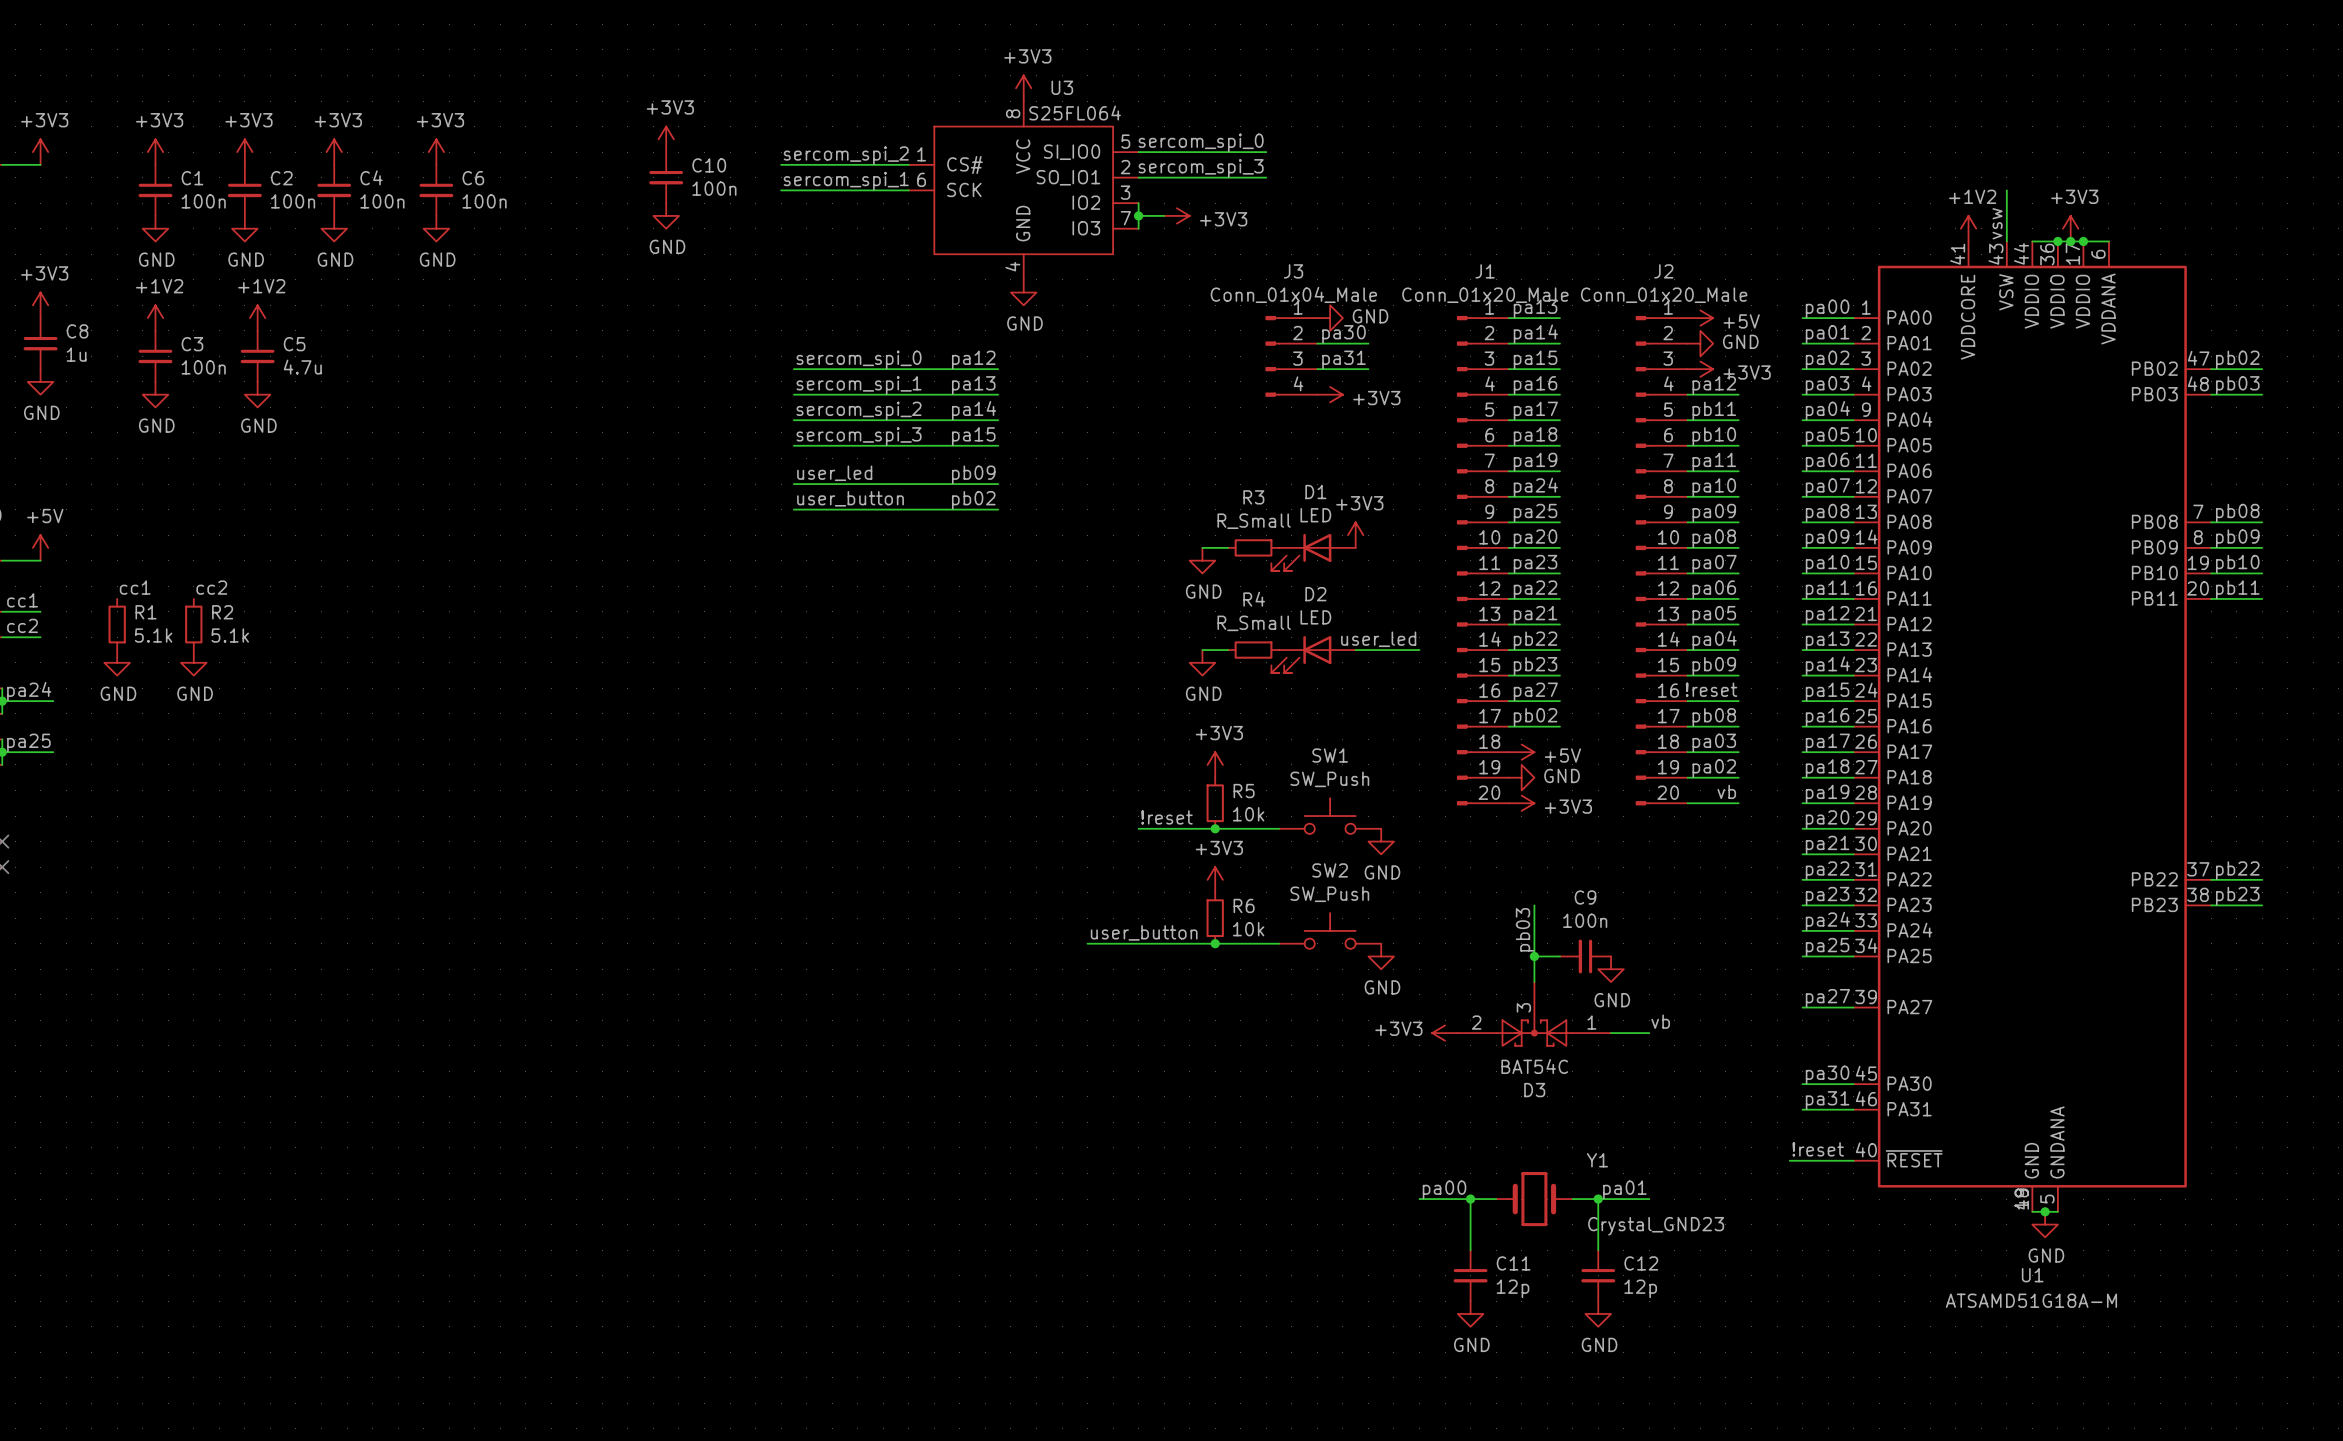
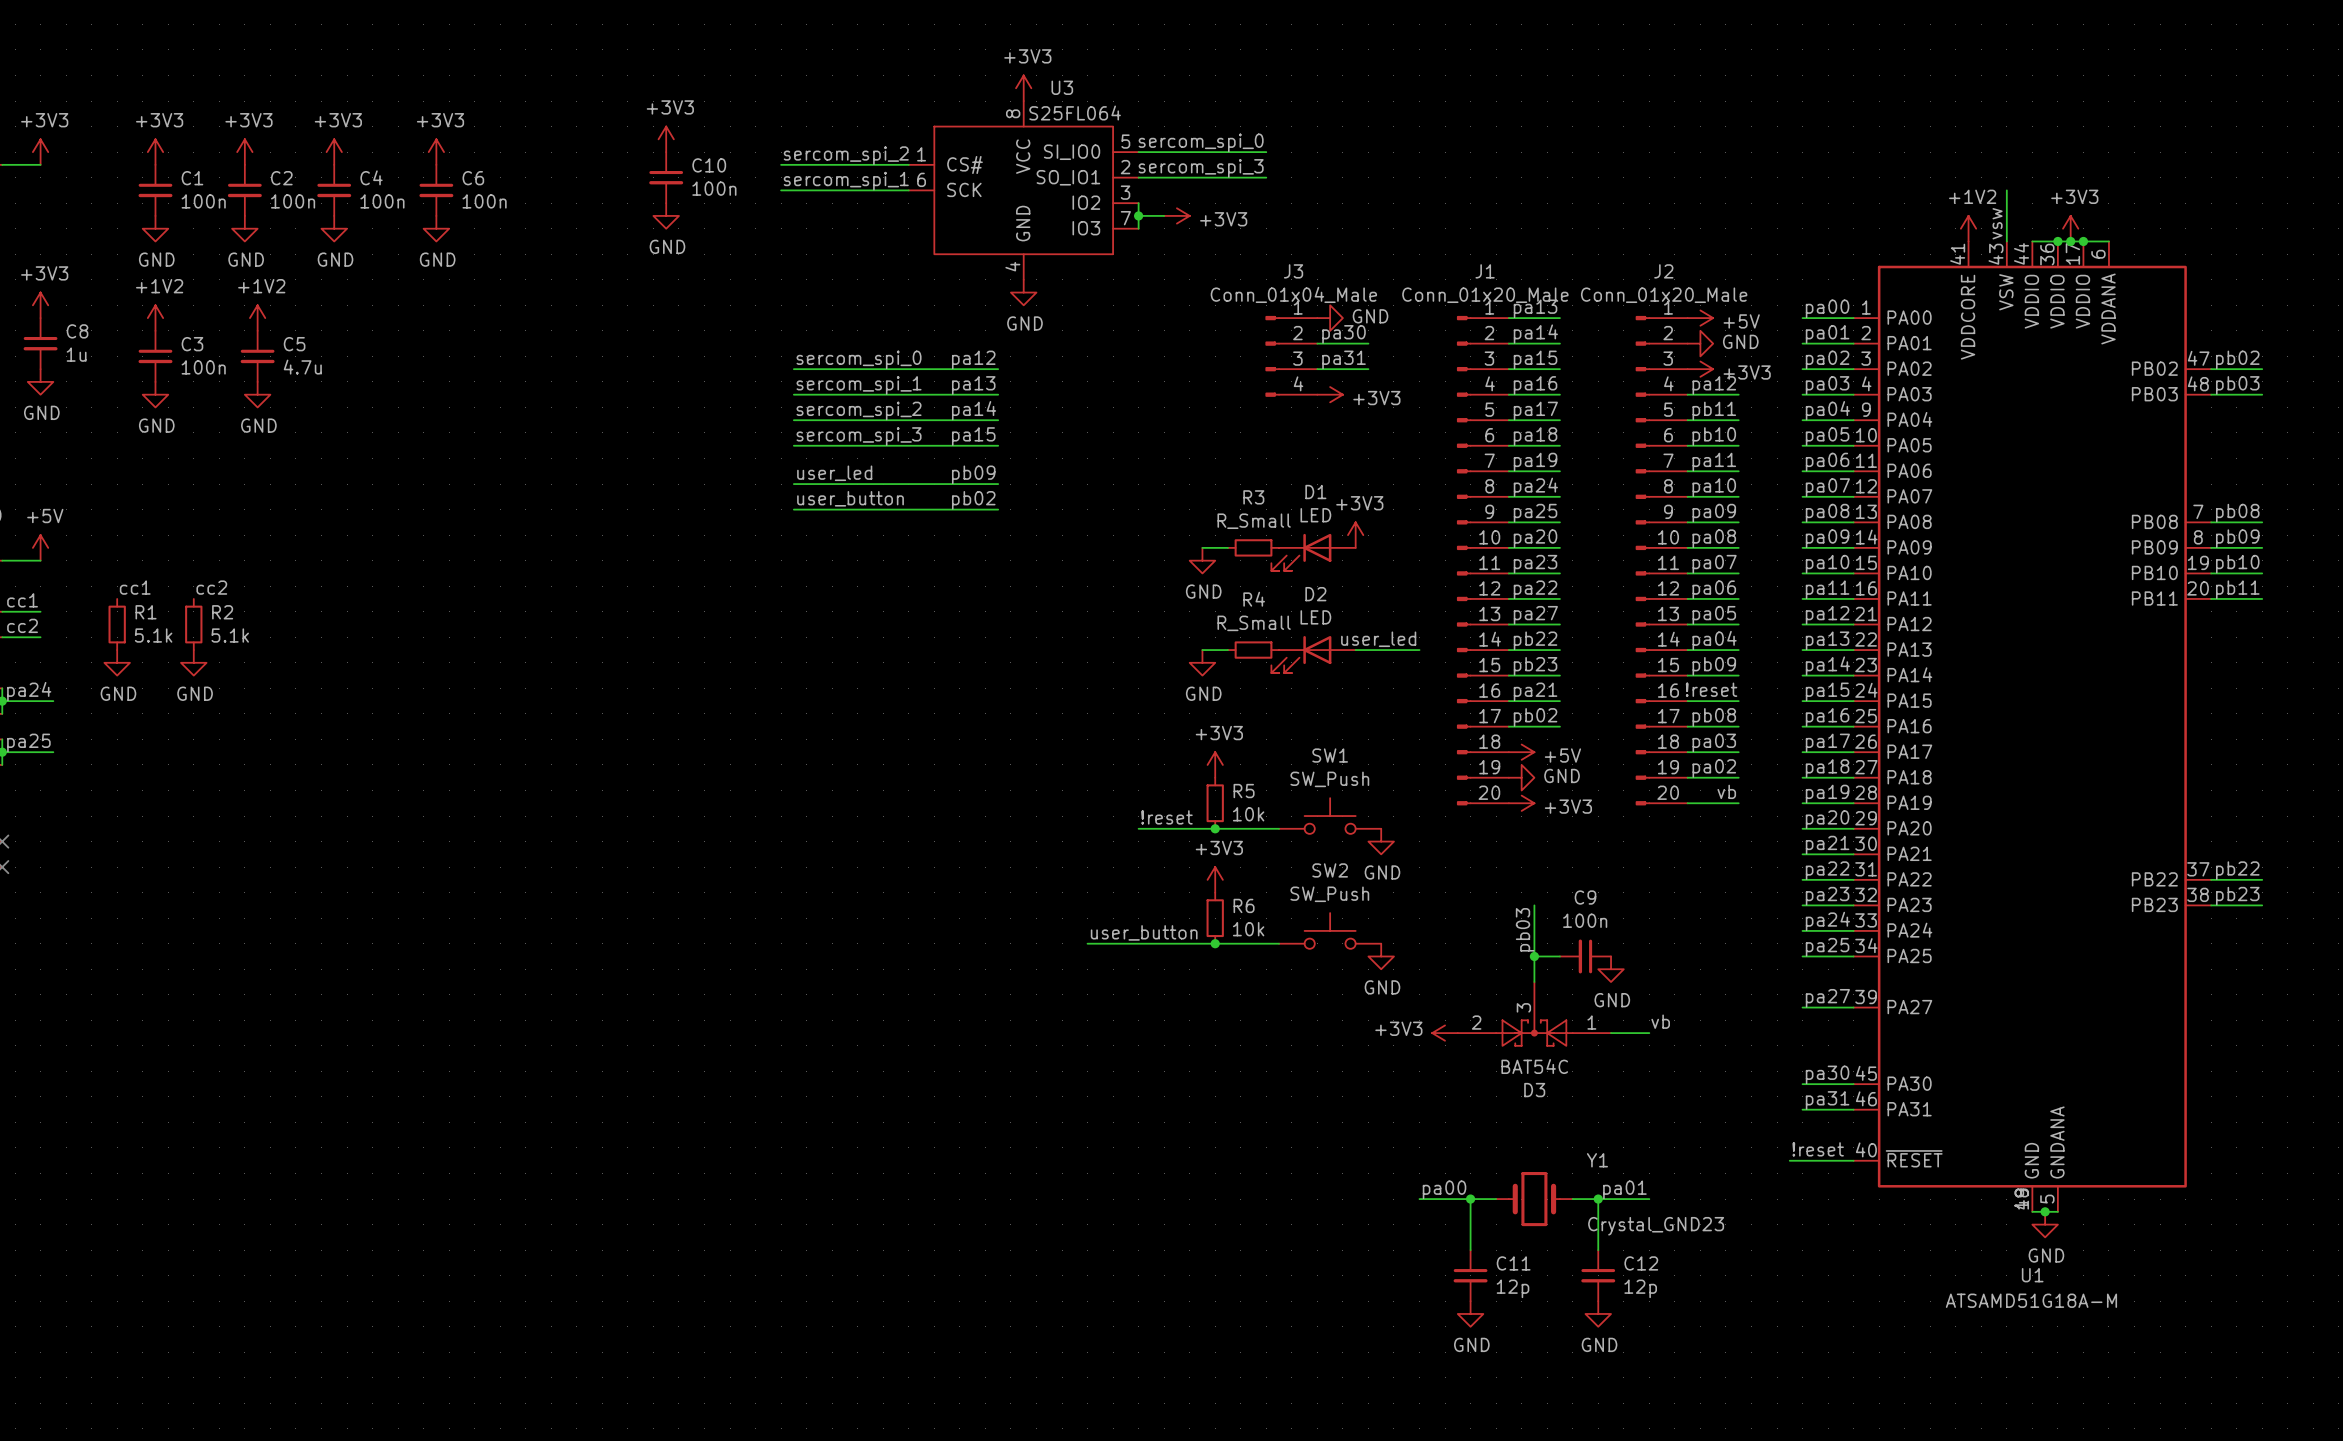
label: pa21 (1535, 615) -> pa27 (1535, 615)
label: pa27 (1535, 691) -> pa21 (1535, 691)

